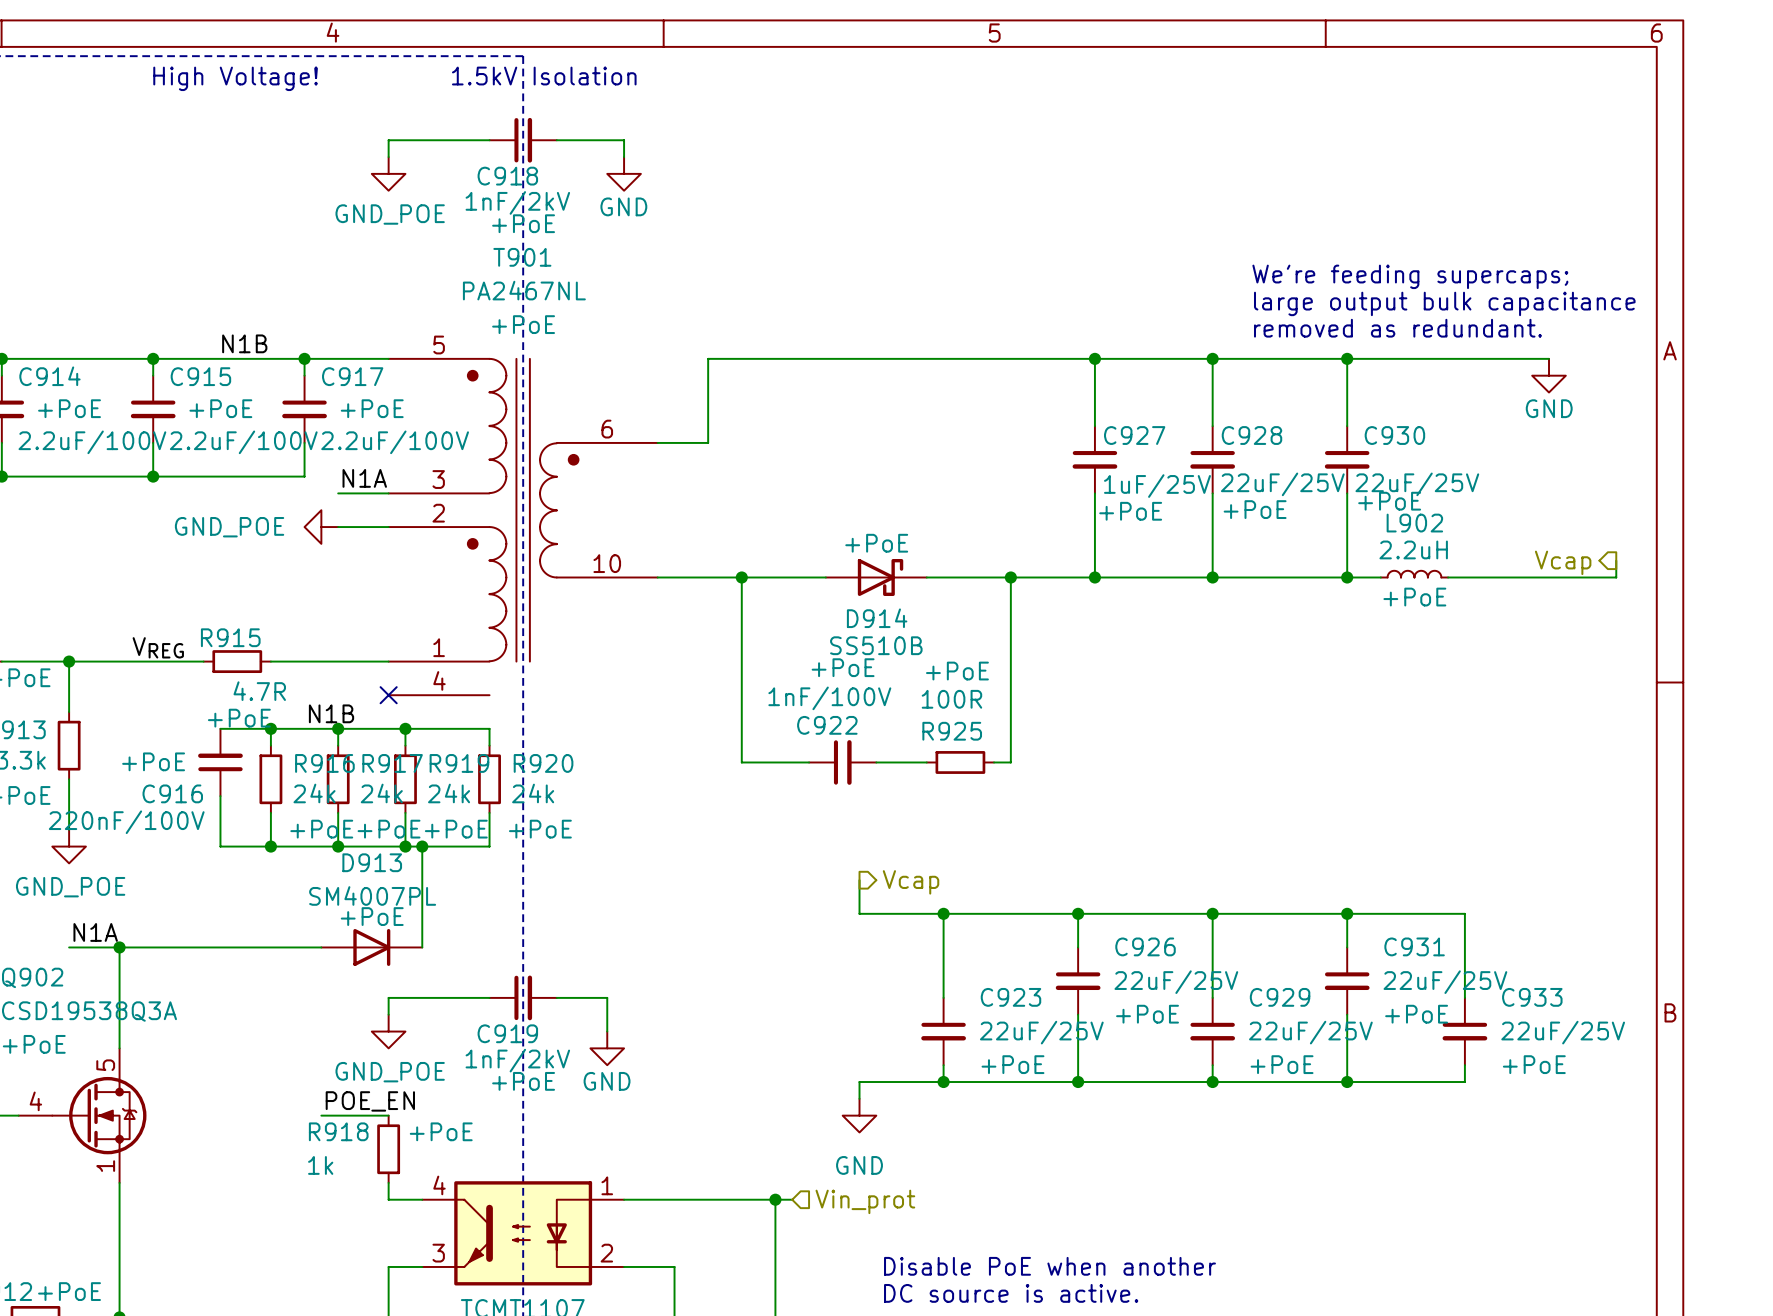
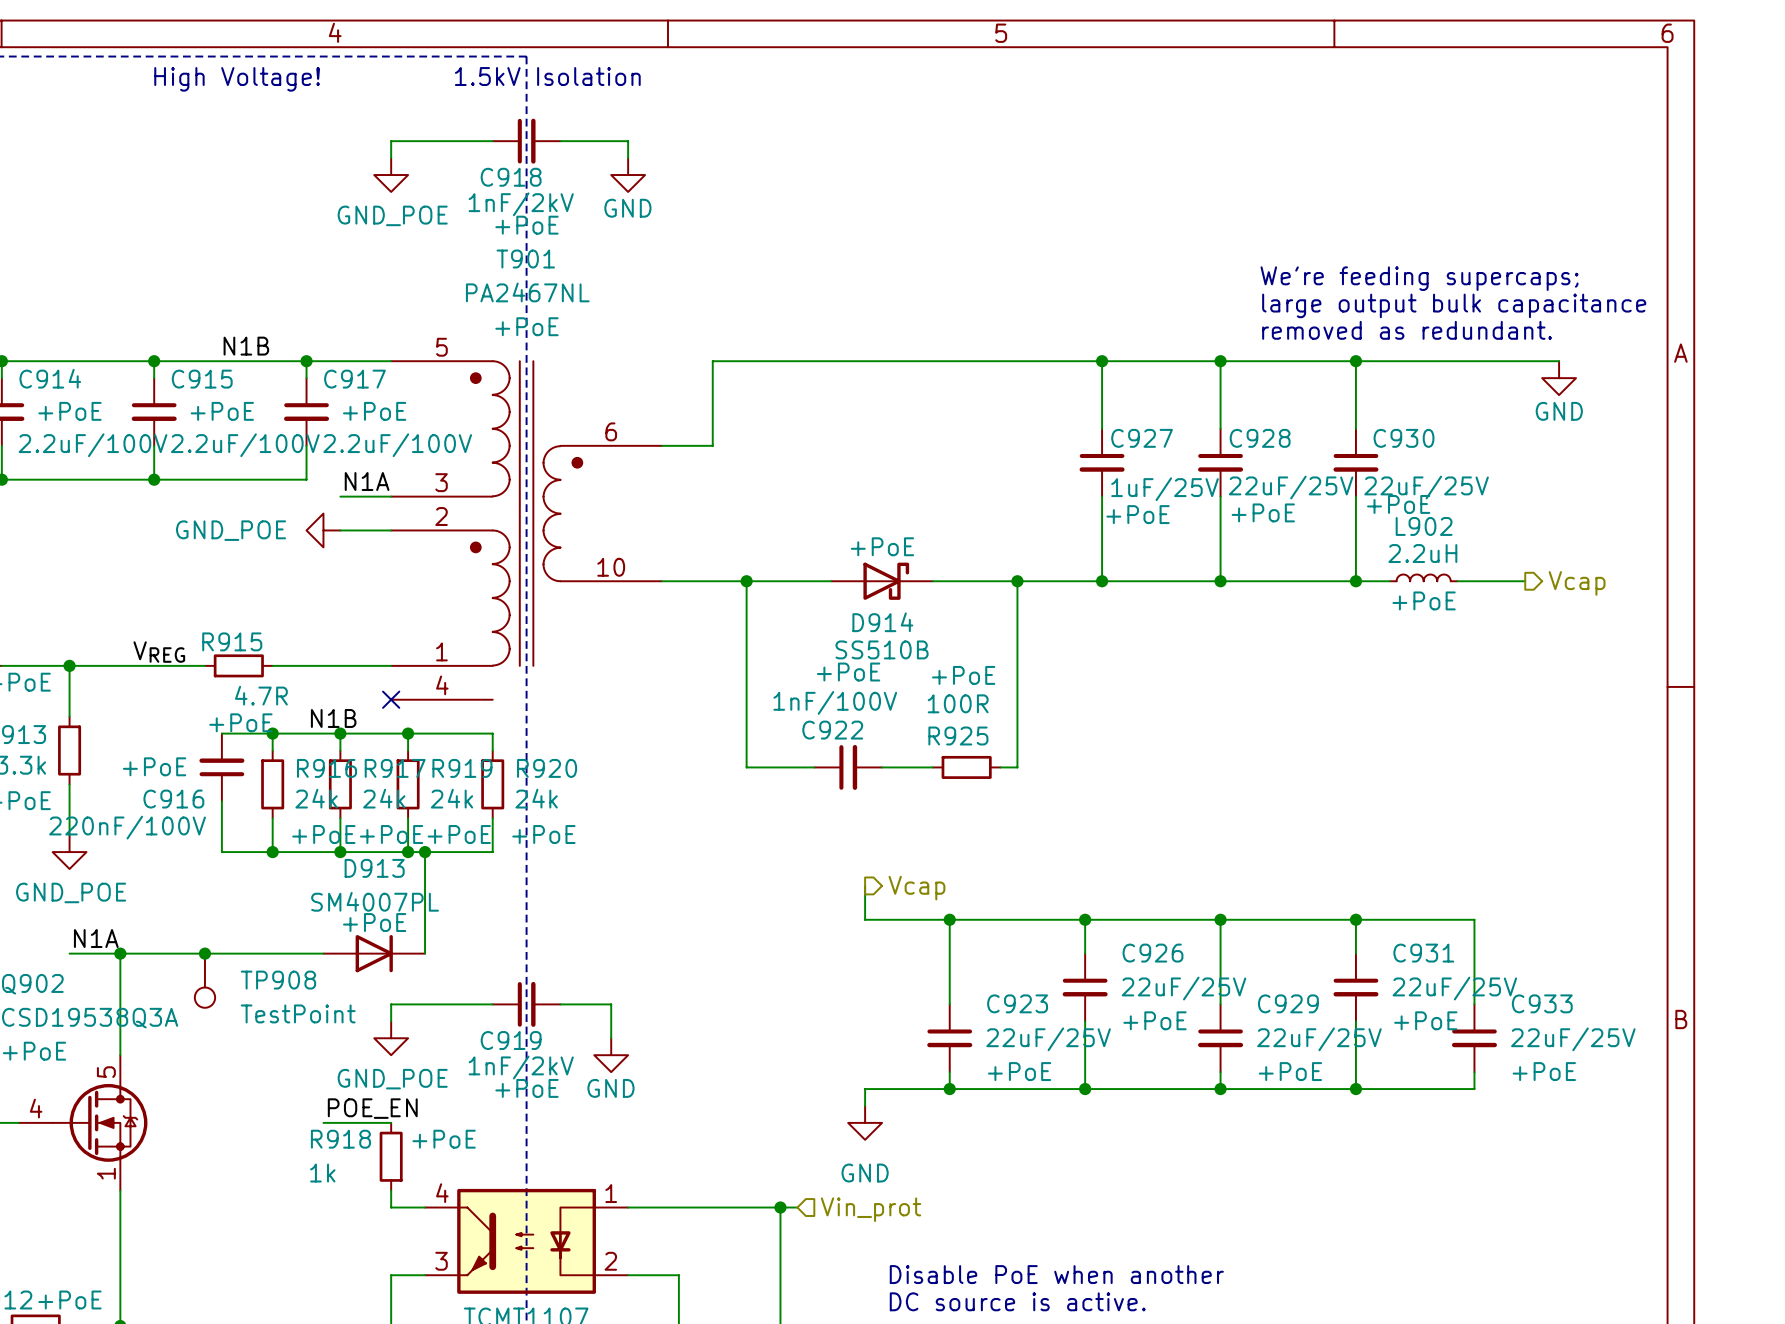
wire: (1616, 560) (1616, 577) (1515, 577) -> none
hierarchical label rotation: 0° (1563, 562) -> 180° (1577, 583)
junction: none -> (204, 953)
TP908: none -> TestPoint (204, 980)

